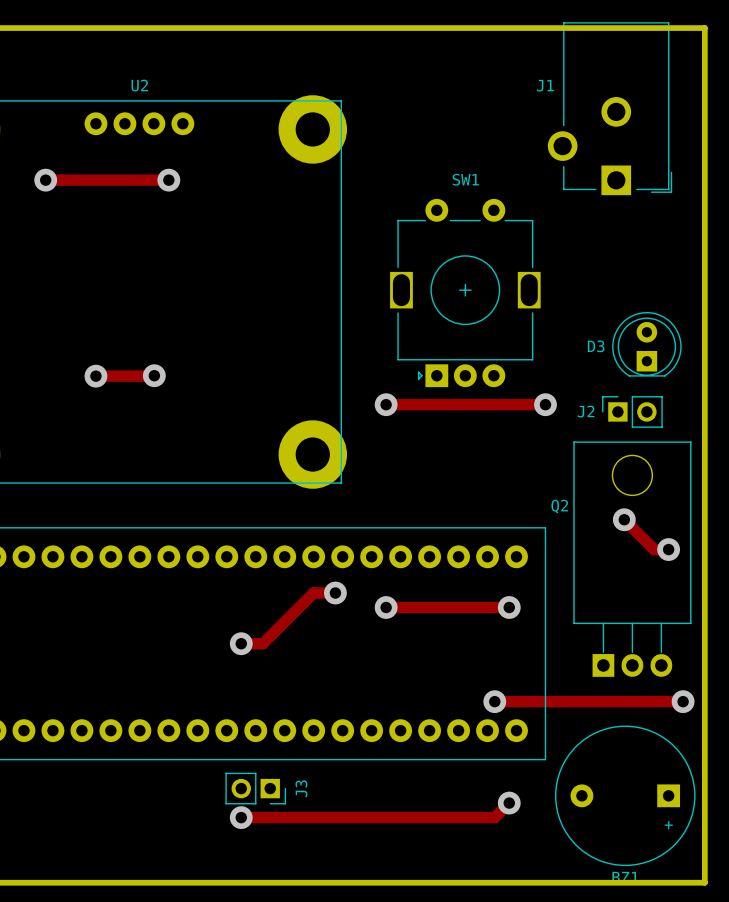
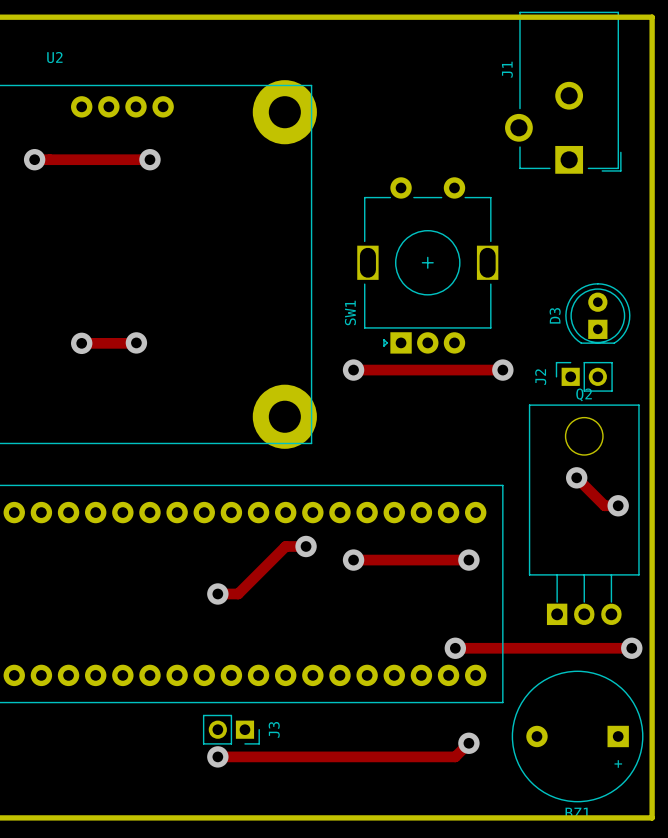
U2 name position: U2 (139, 85) -> U2 (54, 57)
J1 name rotation: 0° (545, 85) -> 90° counterclockwise (507, 69)
SW1 name rotation: 0° (465, 179) -> 90° counterclockwise (350, 312)
SW1 name position: SW1 (465, 179) -> SW1 (350, 312)
D3 name rotation: 0° (596, 346) -> 90° counterclockwise (555, 315)
J2 name rotation: 0° (586, 411) -> 90° counterclockwise (540, 377)
Q2 name position: Q2 (559, 506) -> Q2 (584, 394)

